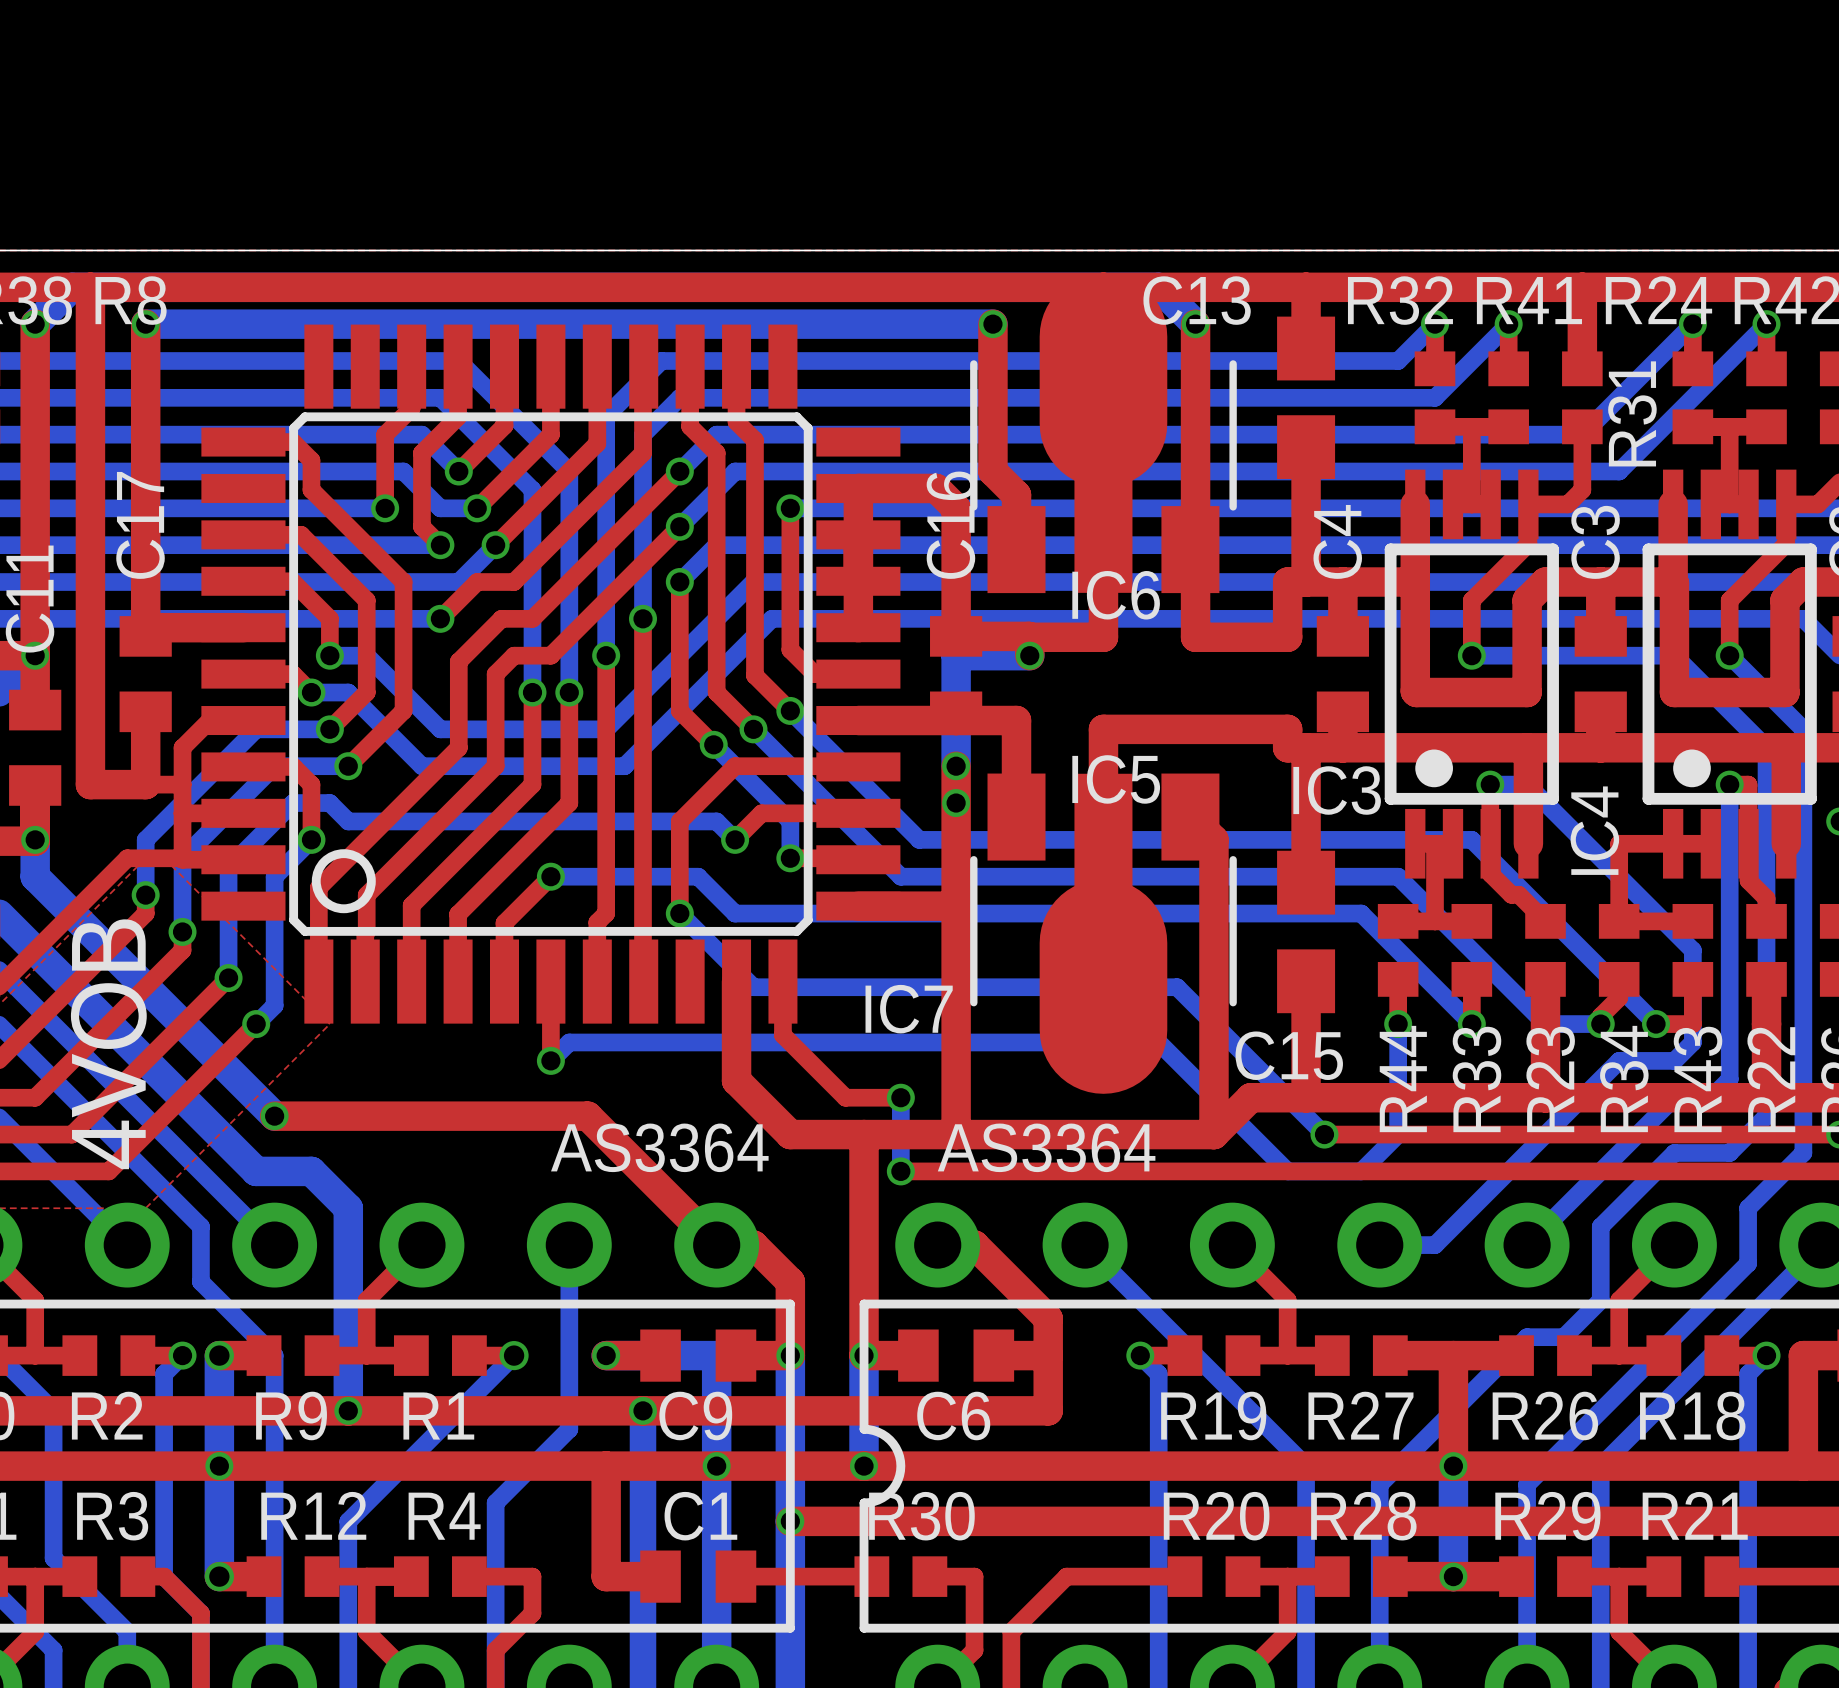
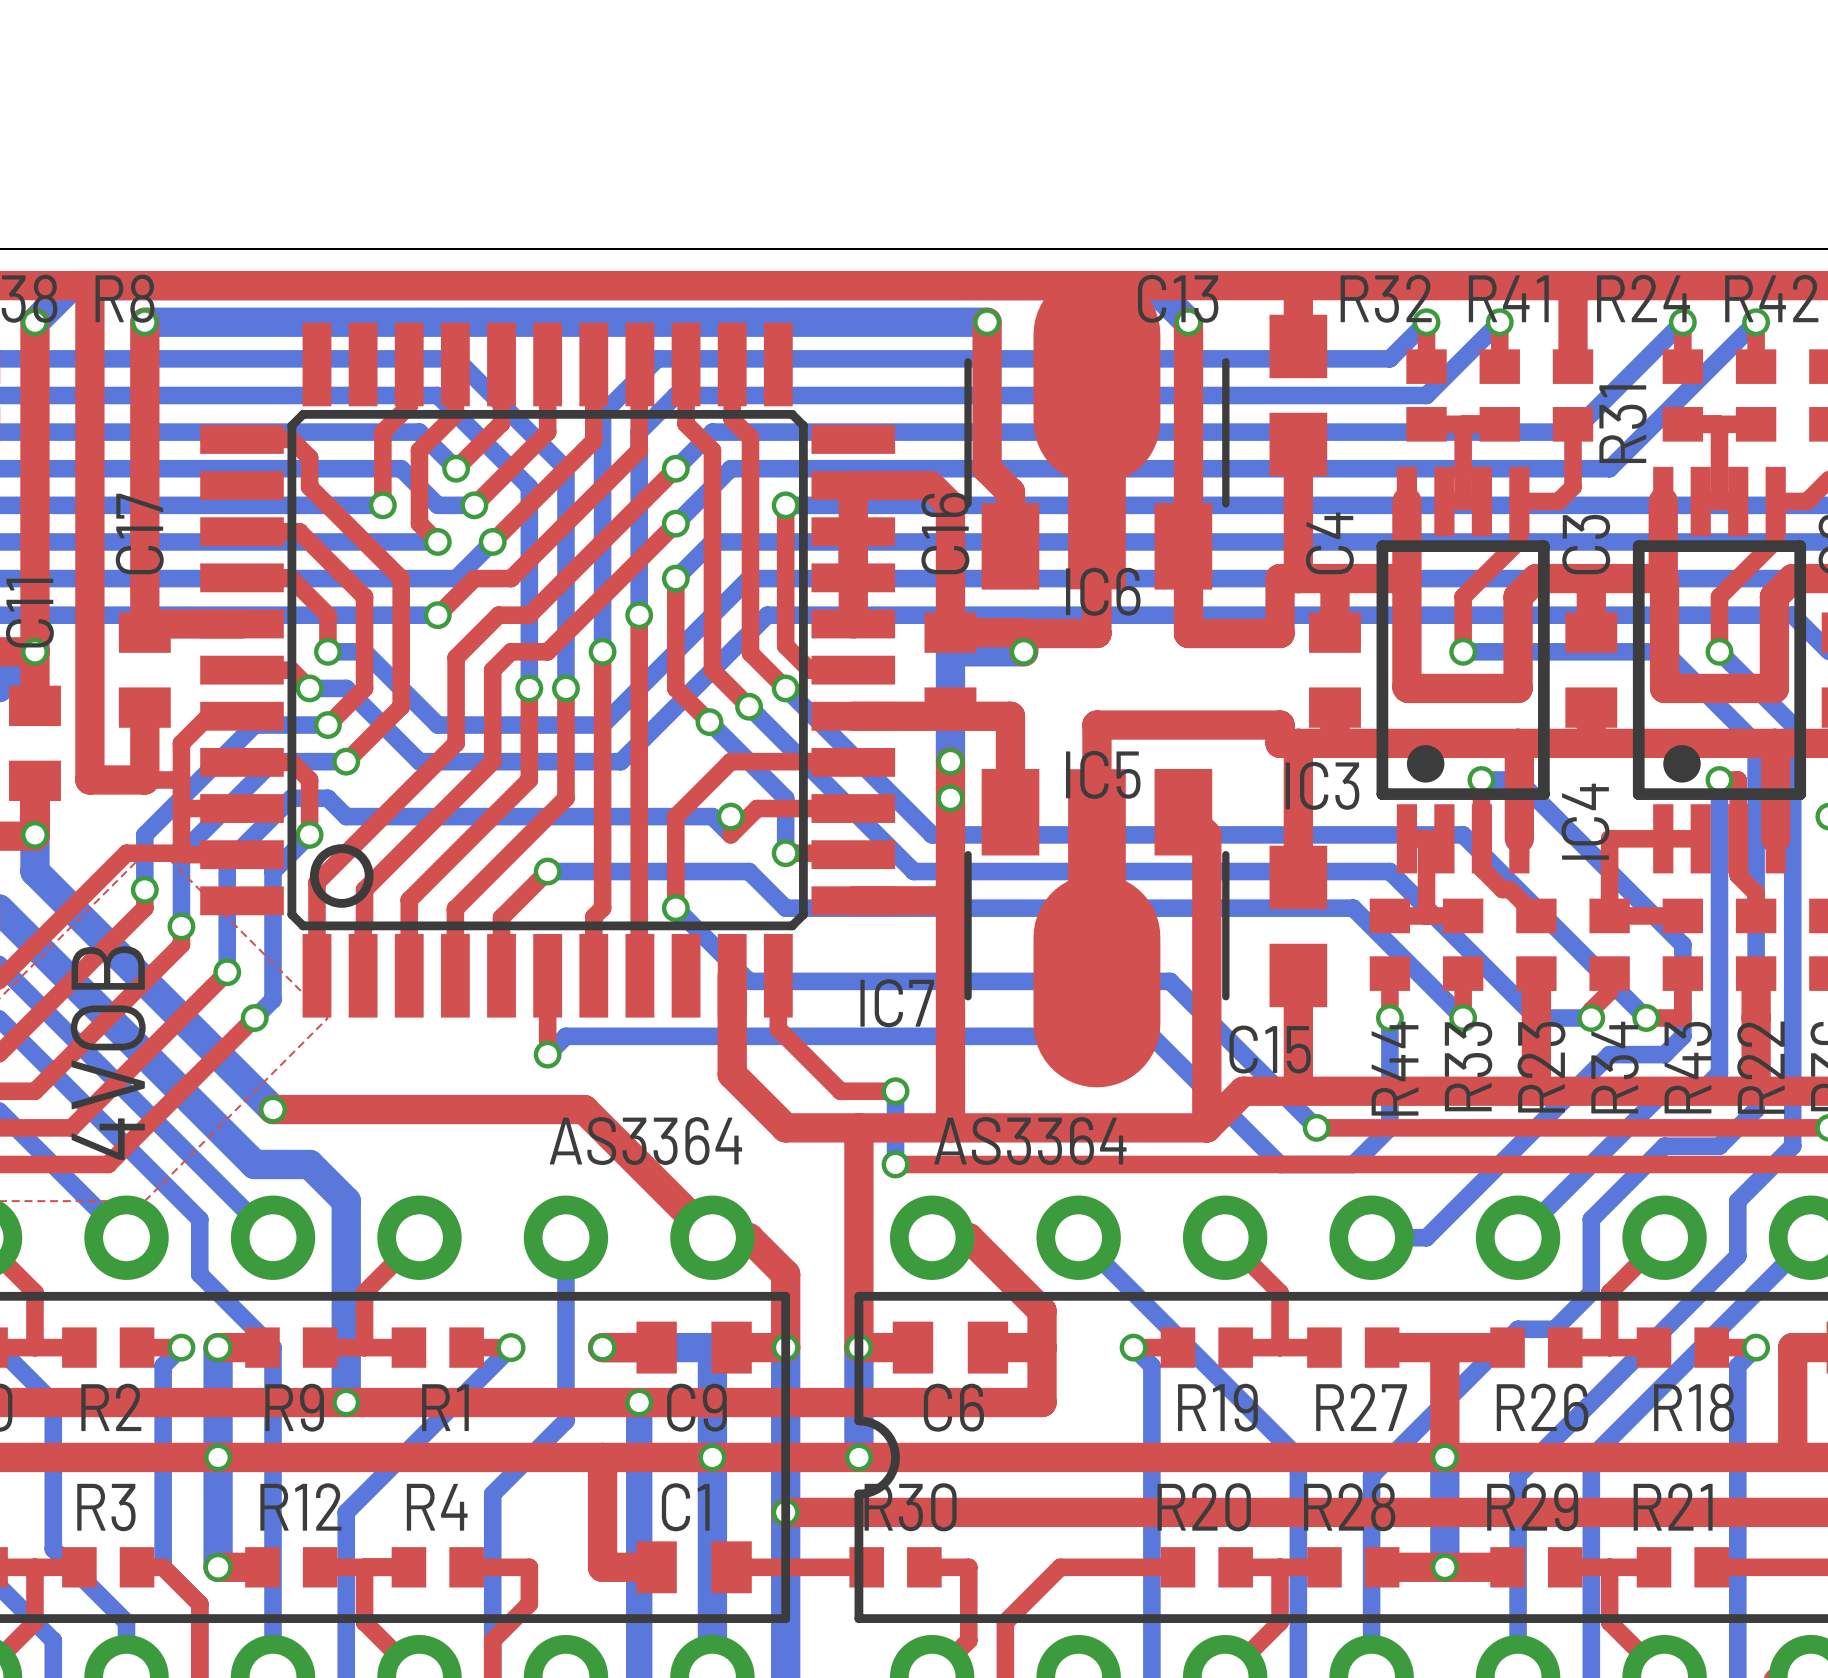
top track: (754, 657) (754, 675) (790, 710) -> (750, 653) (785, 688)
top track: (716, 674) (716, 692) (753, 729) -> (712, 670) (749, 706)
top track: (679, 692) (679, 710) (713, 744) -> (675, 688) (709, 722)
bottom track: (790, 710) (919, 839) (937, 839) -> (785, 688) (932, 834)
via position: (790, 710) -> (785, 688)
bottom track: (753, 729) (900, 876) (919, 876) -> (749, 706) (913, 871)
via position: (753, 729) -> (749, 706)
bottom track: (713, 744) (790, 821) -> (709, 722) (785, 798) (785, 816)
via position: (713, 744) -> (709, 722)
via position: (735, 839) -> (730, 816)
bottom track: (698, 876) (735, 913) (790, 913) -> (694, 871) (749, 871) (785, 908)

